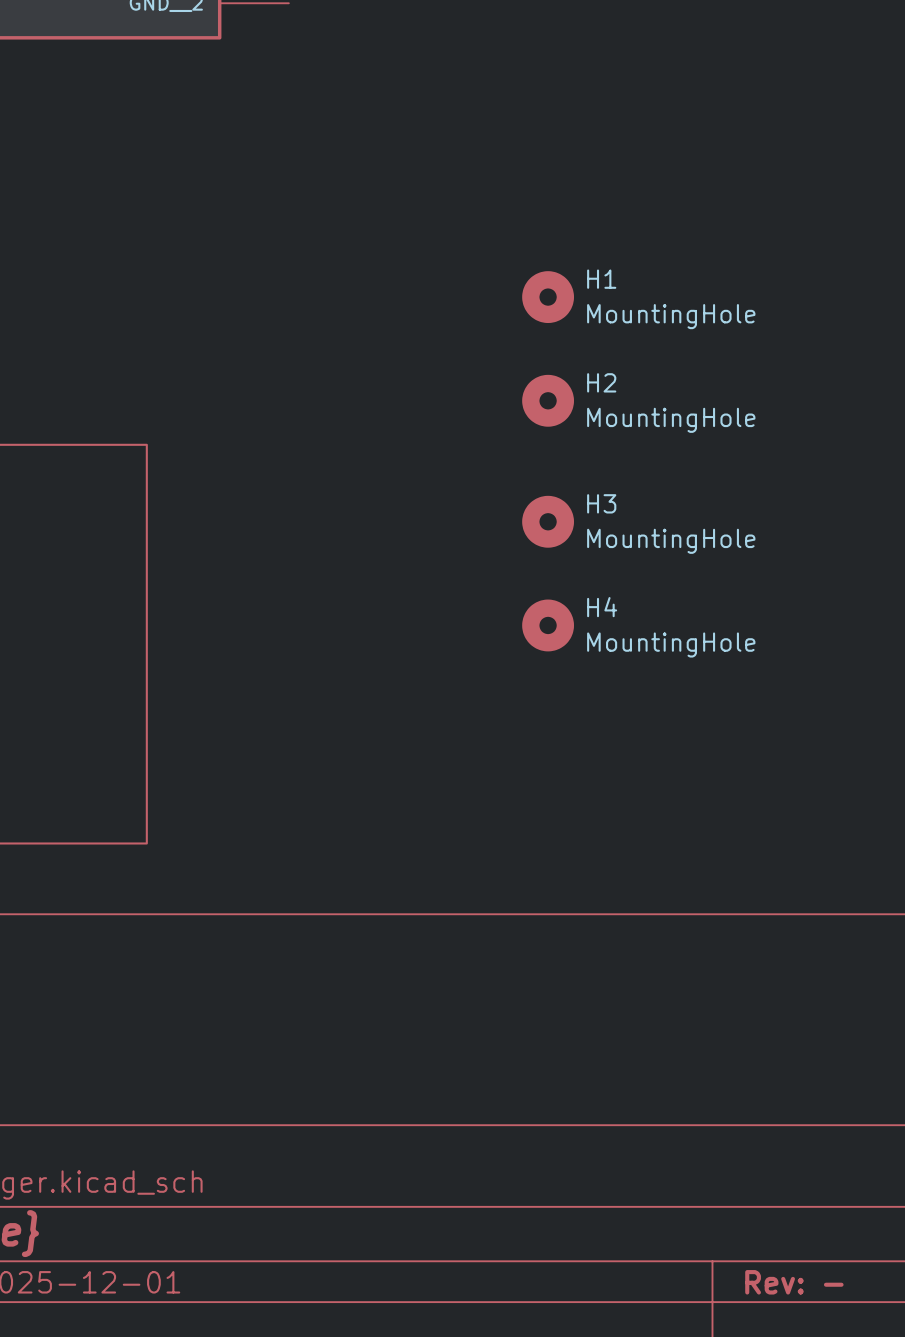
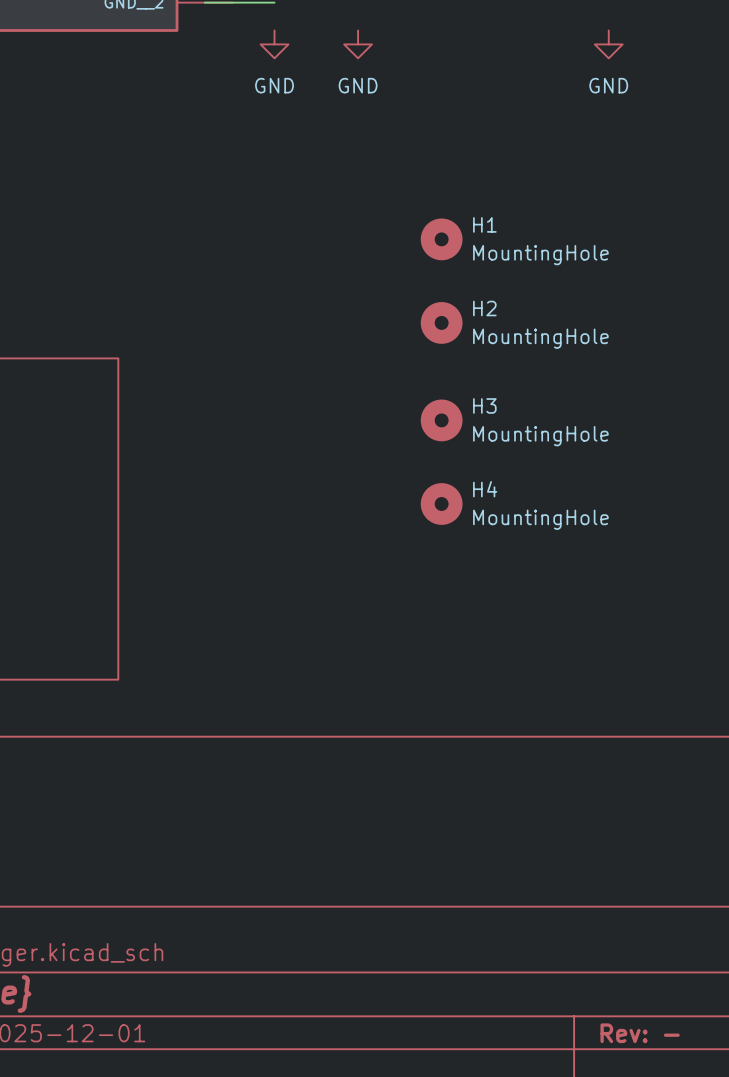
wire: none -> (204, 2) (274, 2)
power symbol: none -> GND (274, 44)
power symbol: none -> GND (358, 44)
power symbol: none -> GND (608, 44)

